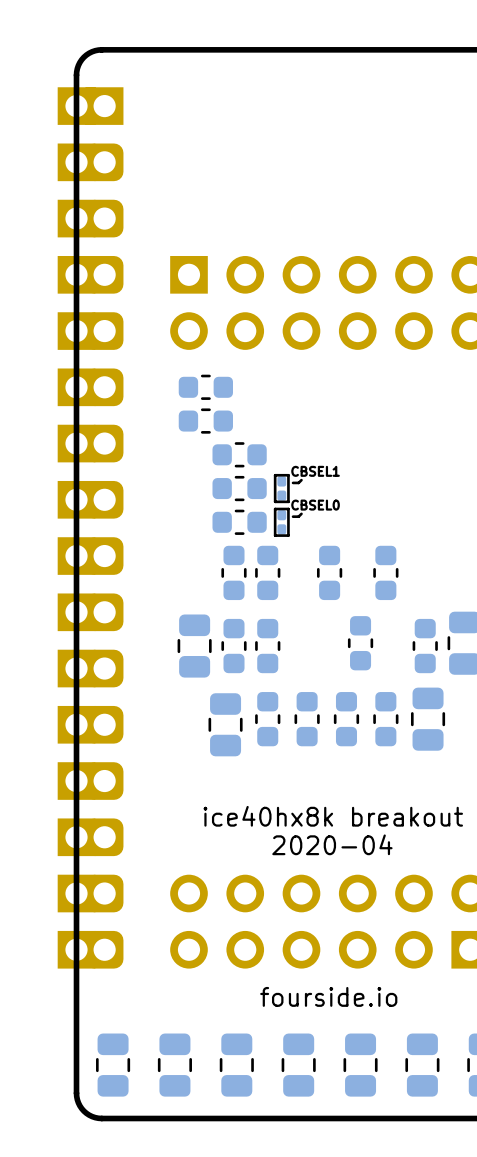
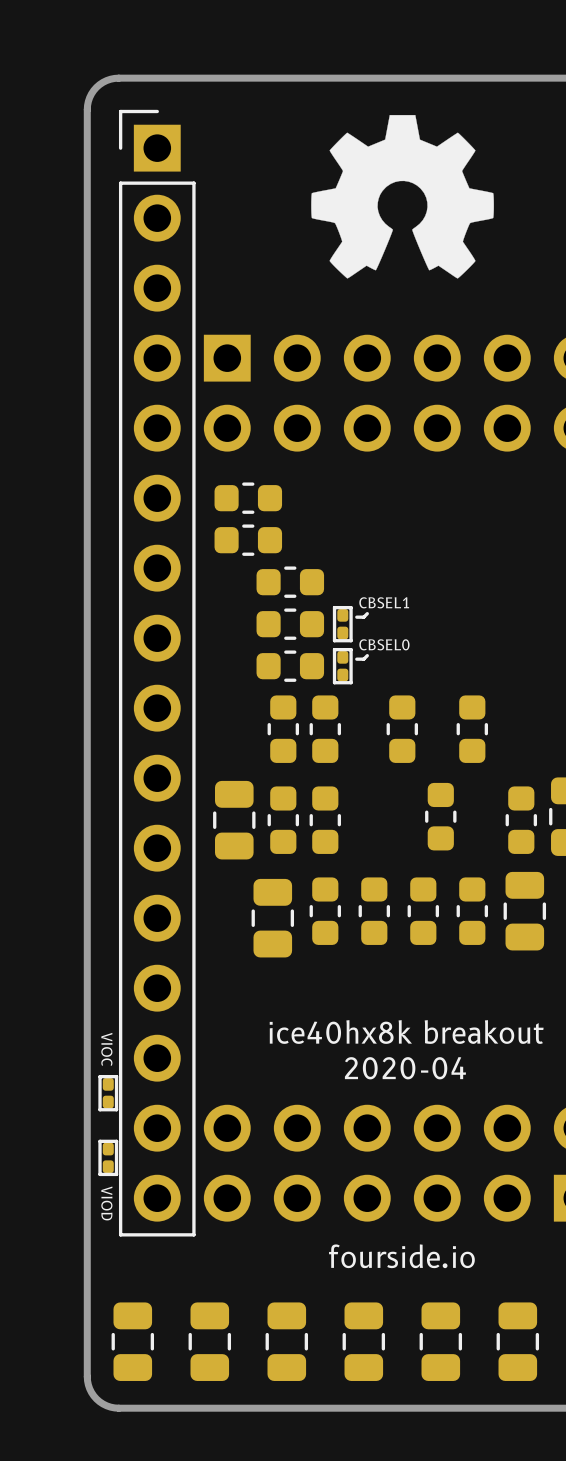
drawing: none -> [311, 115, 494, 279]
part: (90, 527) -> none
part: none -> (157, 673)
text: none -> VIOC (106, 1049)
part: none -> (108, 1093)
part: none -> (108, 1157)
text: none -> VIOD (106, 1203)

